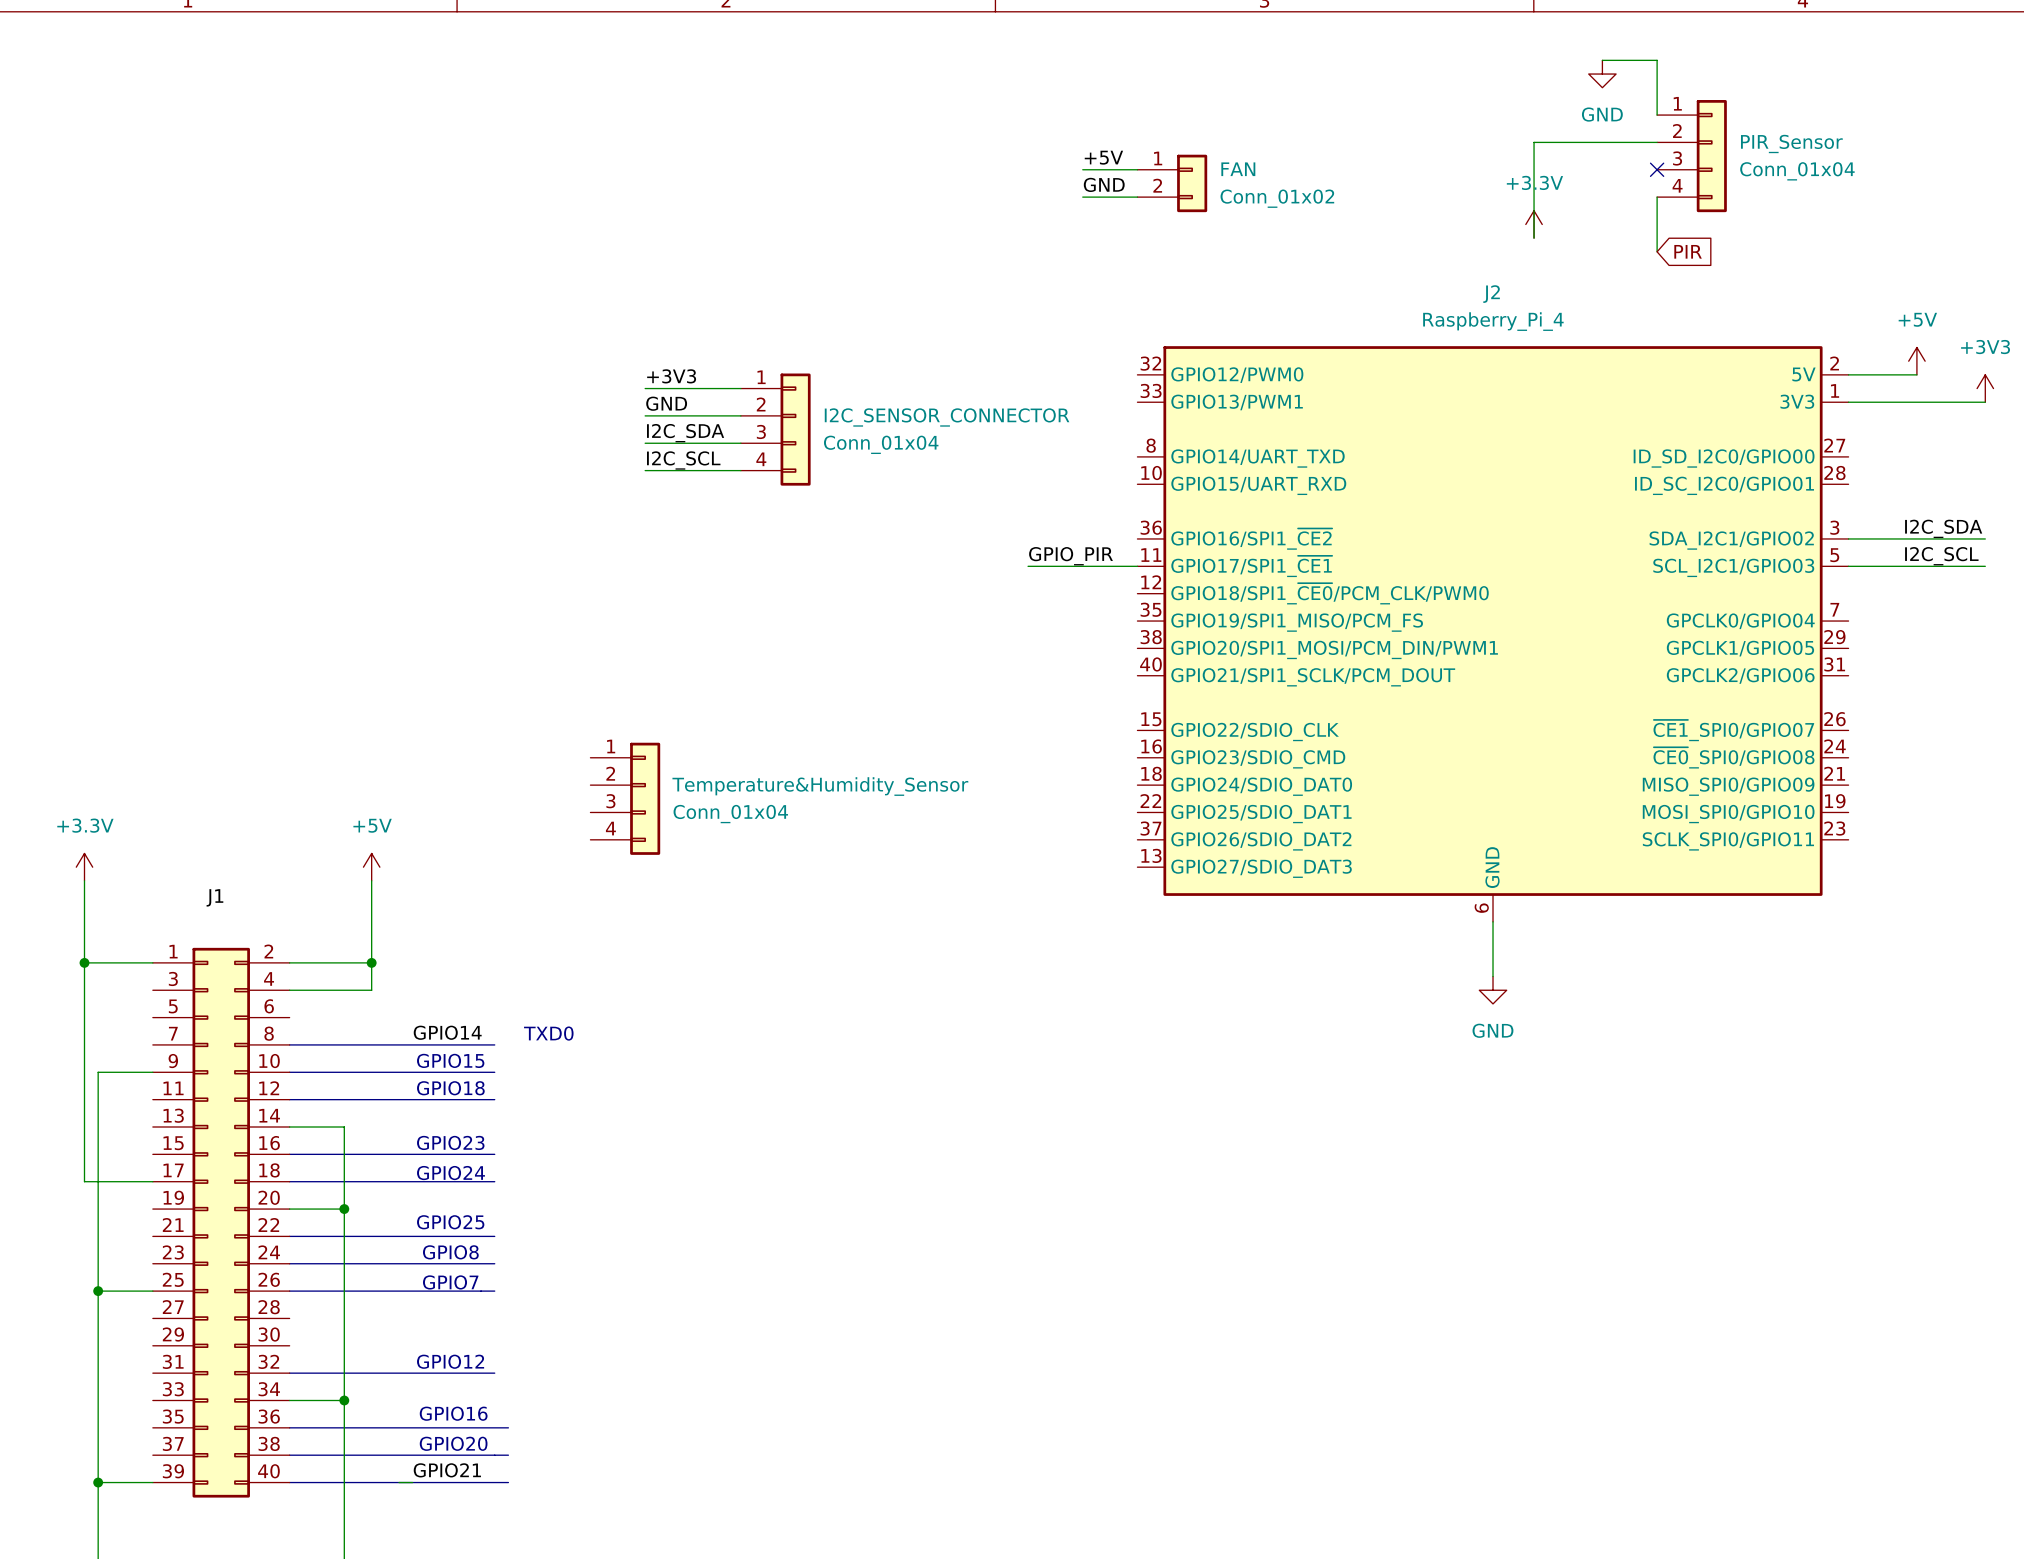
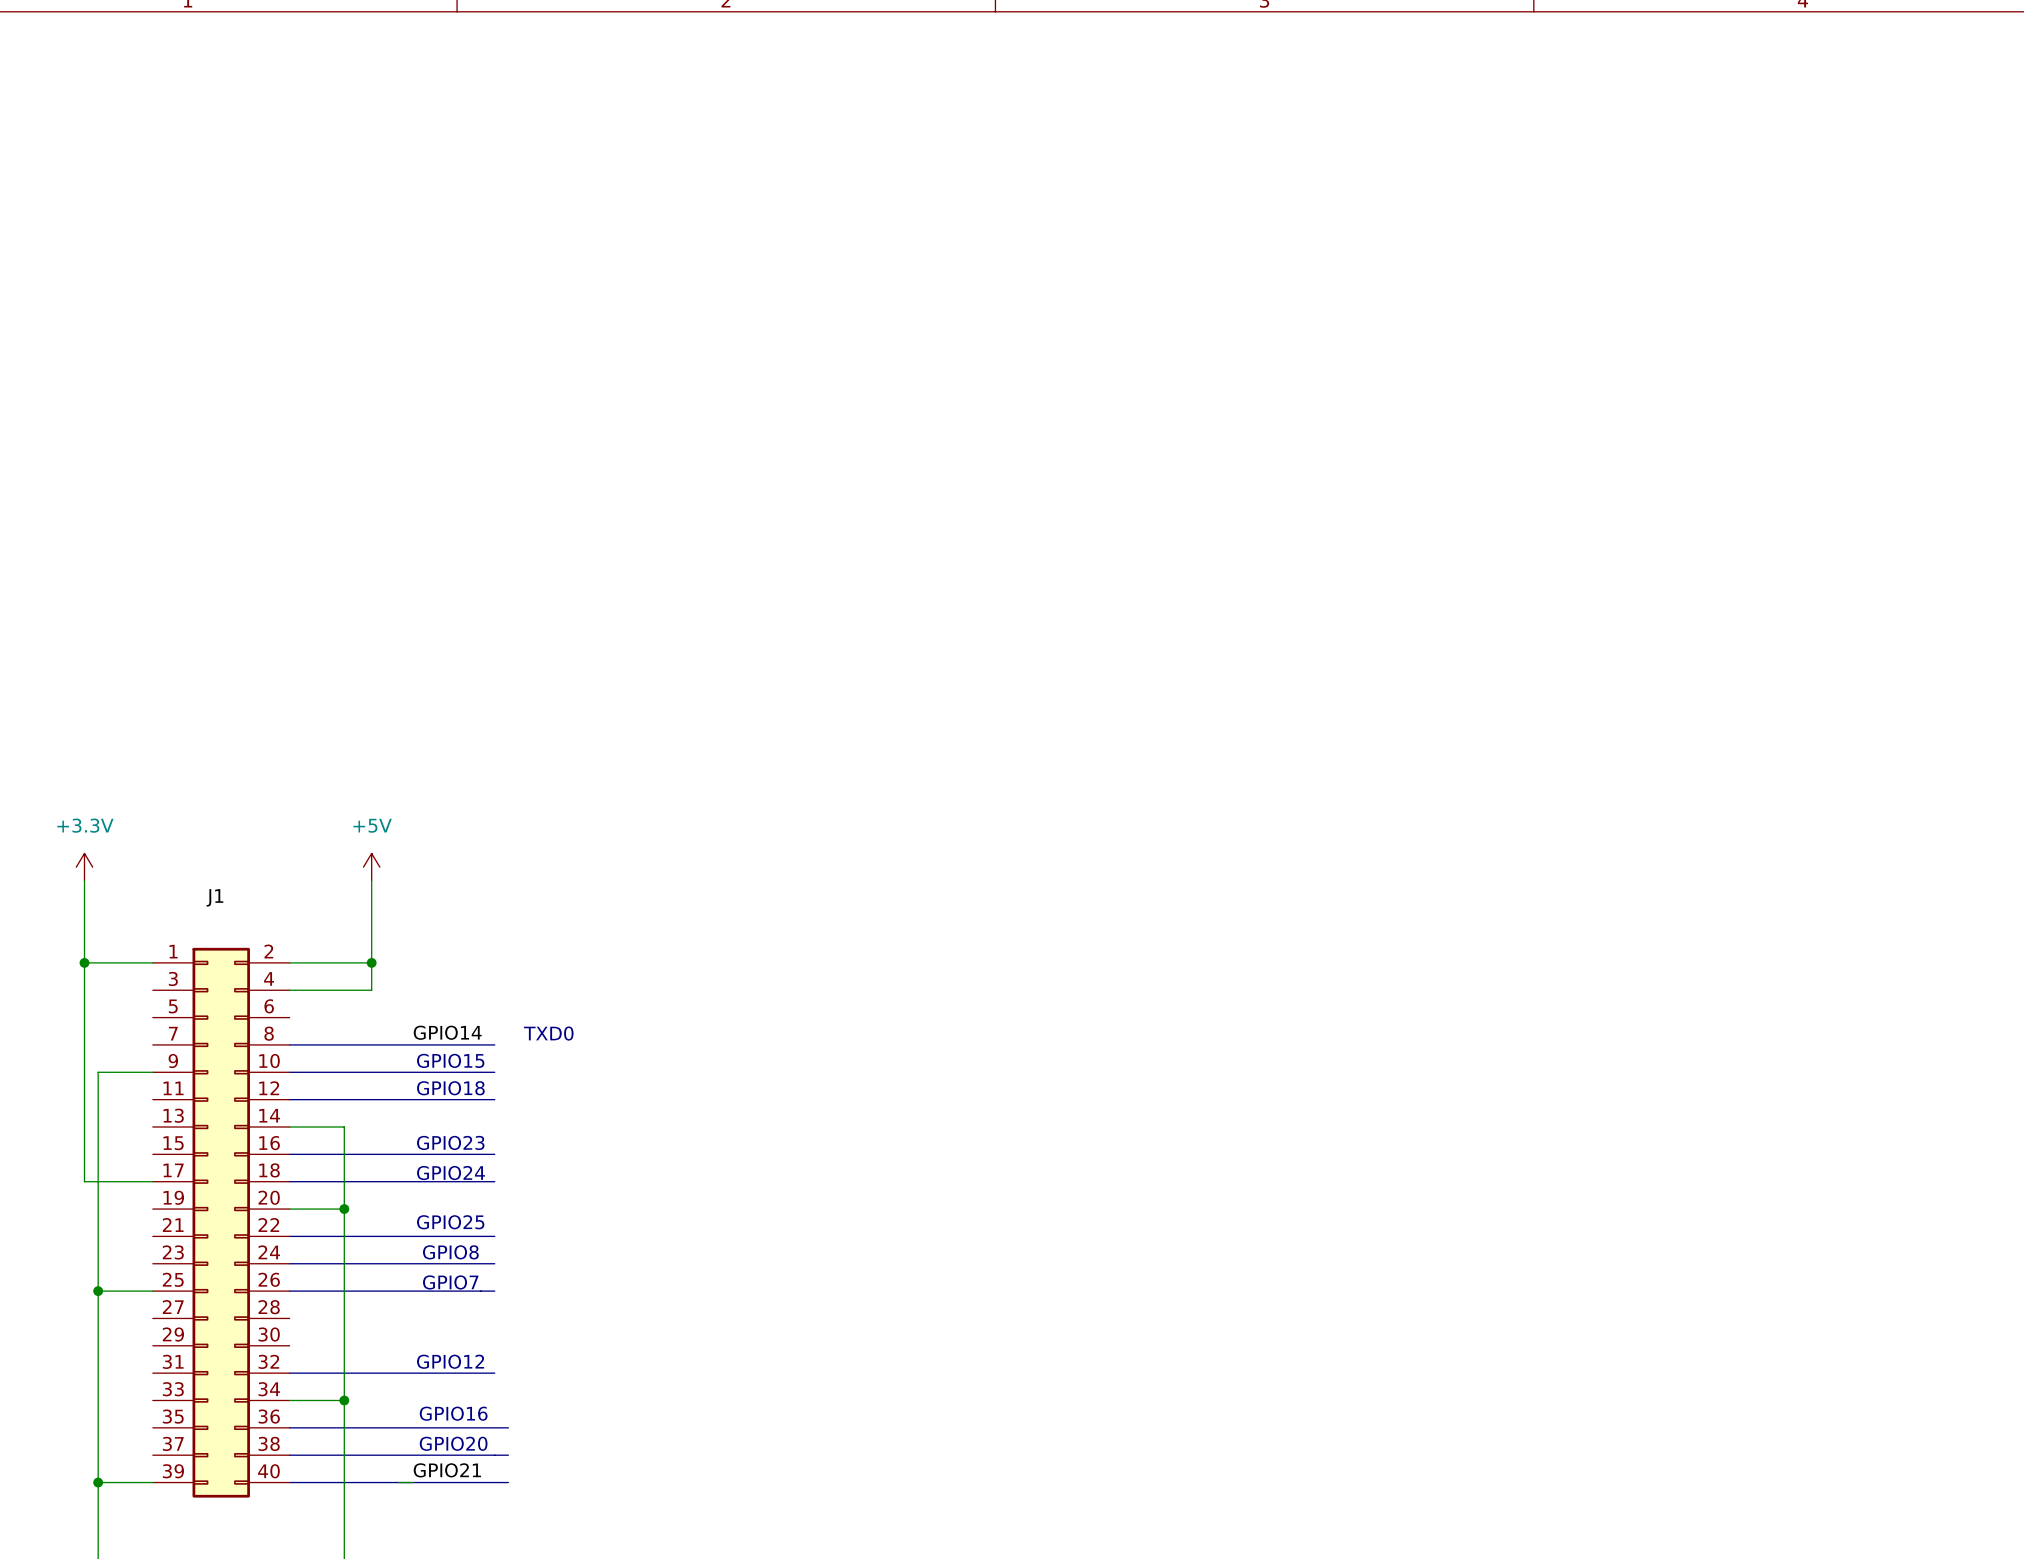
wire: (1602, 60) (1657, 60) (1657, 115) -> none
power symbol: GND (1602, 74) -> none
wire: (1657, 142) (1534, 142) (1534, 238) -> none
PIR_Sensor: Conn_01x04 (1691, 156) -> none
label: +5V (1103, 157) -> none
wire: (1082, 169) (1137, 169) -> none
no-connect mark: (1657, 169) -> none
FAN: Conn_01x02 (1172, 183) -> none
label: GND (1104, 184) -> none
wire: (1082, 197) (1137, 197) -> none
wire: (1657, 197) (1657, 251) -> none
power symbol: +3.3V (1534, 224) -> none
global label: PIR (1688, 251) -> none
power symbol: +5V (1916, 361) -> none
wire: (1848, 374) (1916, 374) -> none
label: +3V3 (671, 376) -> none
wire: (645, 388) (740, 388) -> none
power symbol: +3V3 (1985, 388) -> none
wire: (1848, 402) (1985, 402) -> none
label: GND (666, 403) -> none
wire: (645, 415) (740, 415) -> none
I2C_SENSOR_CONNECTOR: Conn_01x04 (775, 429) -> none
label: I2C_SDA (685, 433) -> none
wire: (645, 443) (740, 443) -> none
label: I2C_SCL (683, 460) -> none
wire: (645, 470) (740, 470) -> none
label: I2C_SDA (1943, 528) -> none
wire: (1848, 538) (1985, 538) -> none
label: GPIO_PIR (1071, 556) -> none
label: I2C_SCL (1941, 556) -> none
wire: (1028, 566) (1137, 566) -> none
wire: (1848, 566) (1985, 566) -> none
J2: Raspberry_Pi_4 (1493, 634) -> none
Temperature&Humidity_Sensor: Conn_01x04 (625, 798) -> none
wire: (1493, 921) (1493, 976) -> none
power symbol: GND (1493, 990) -> none

